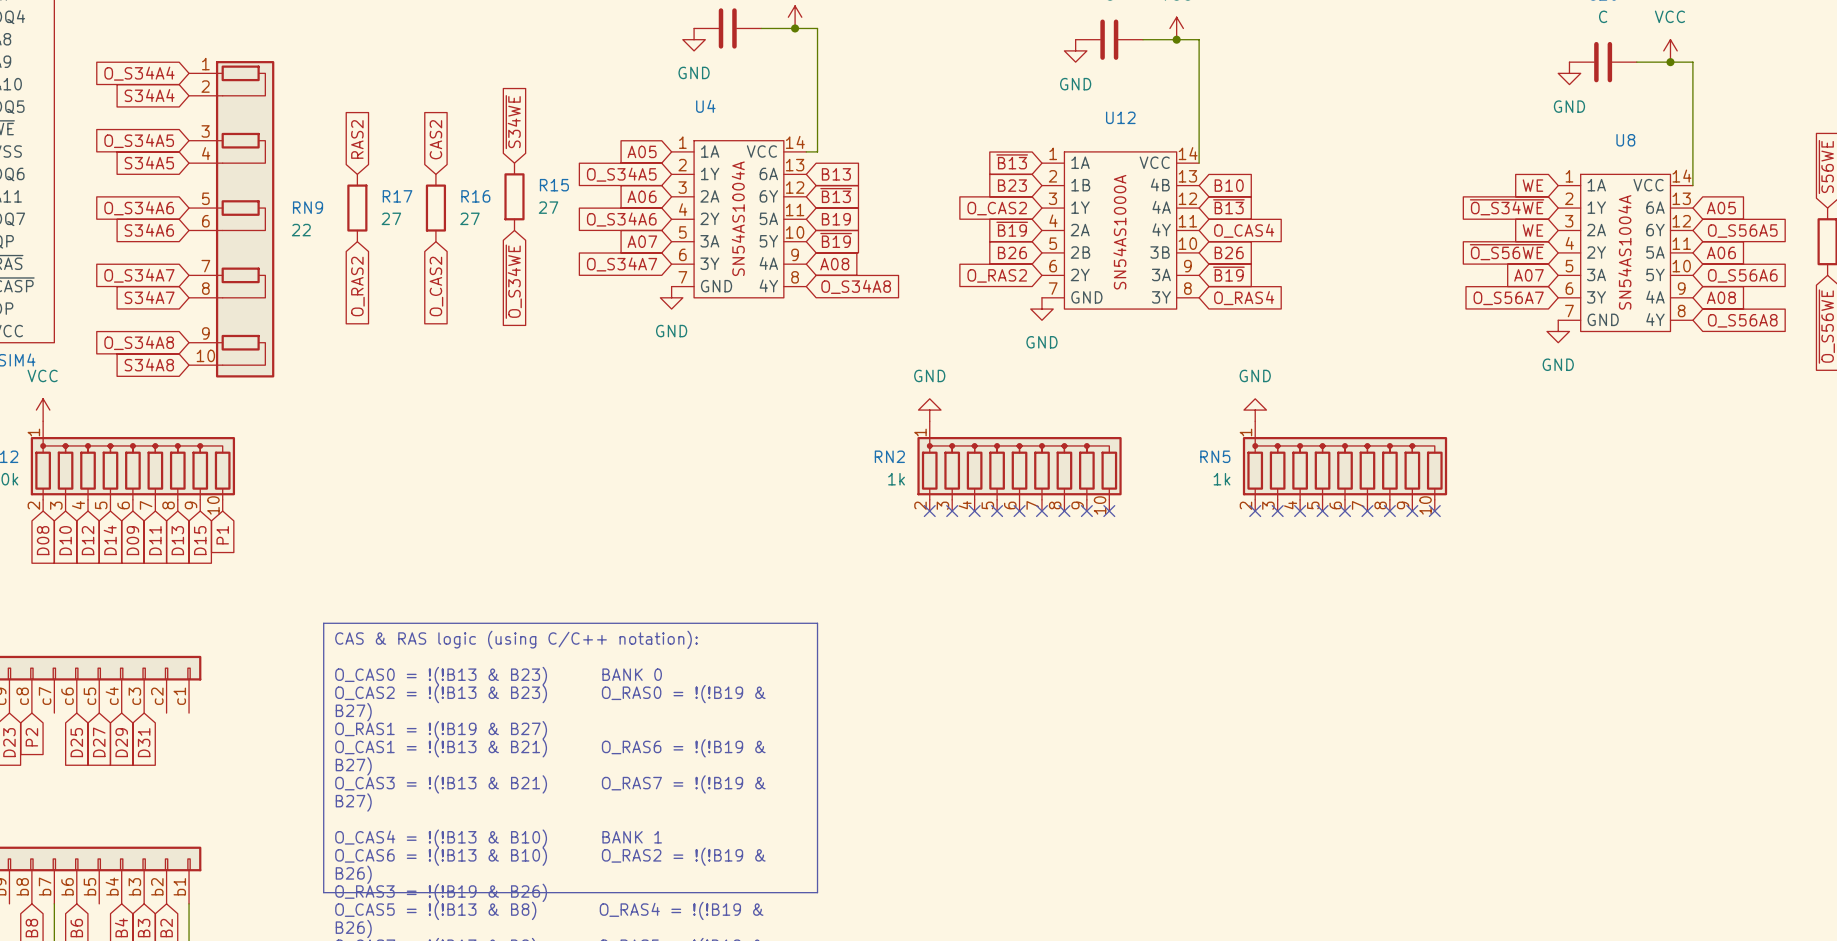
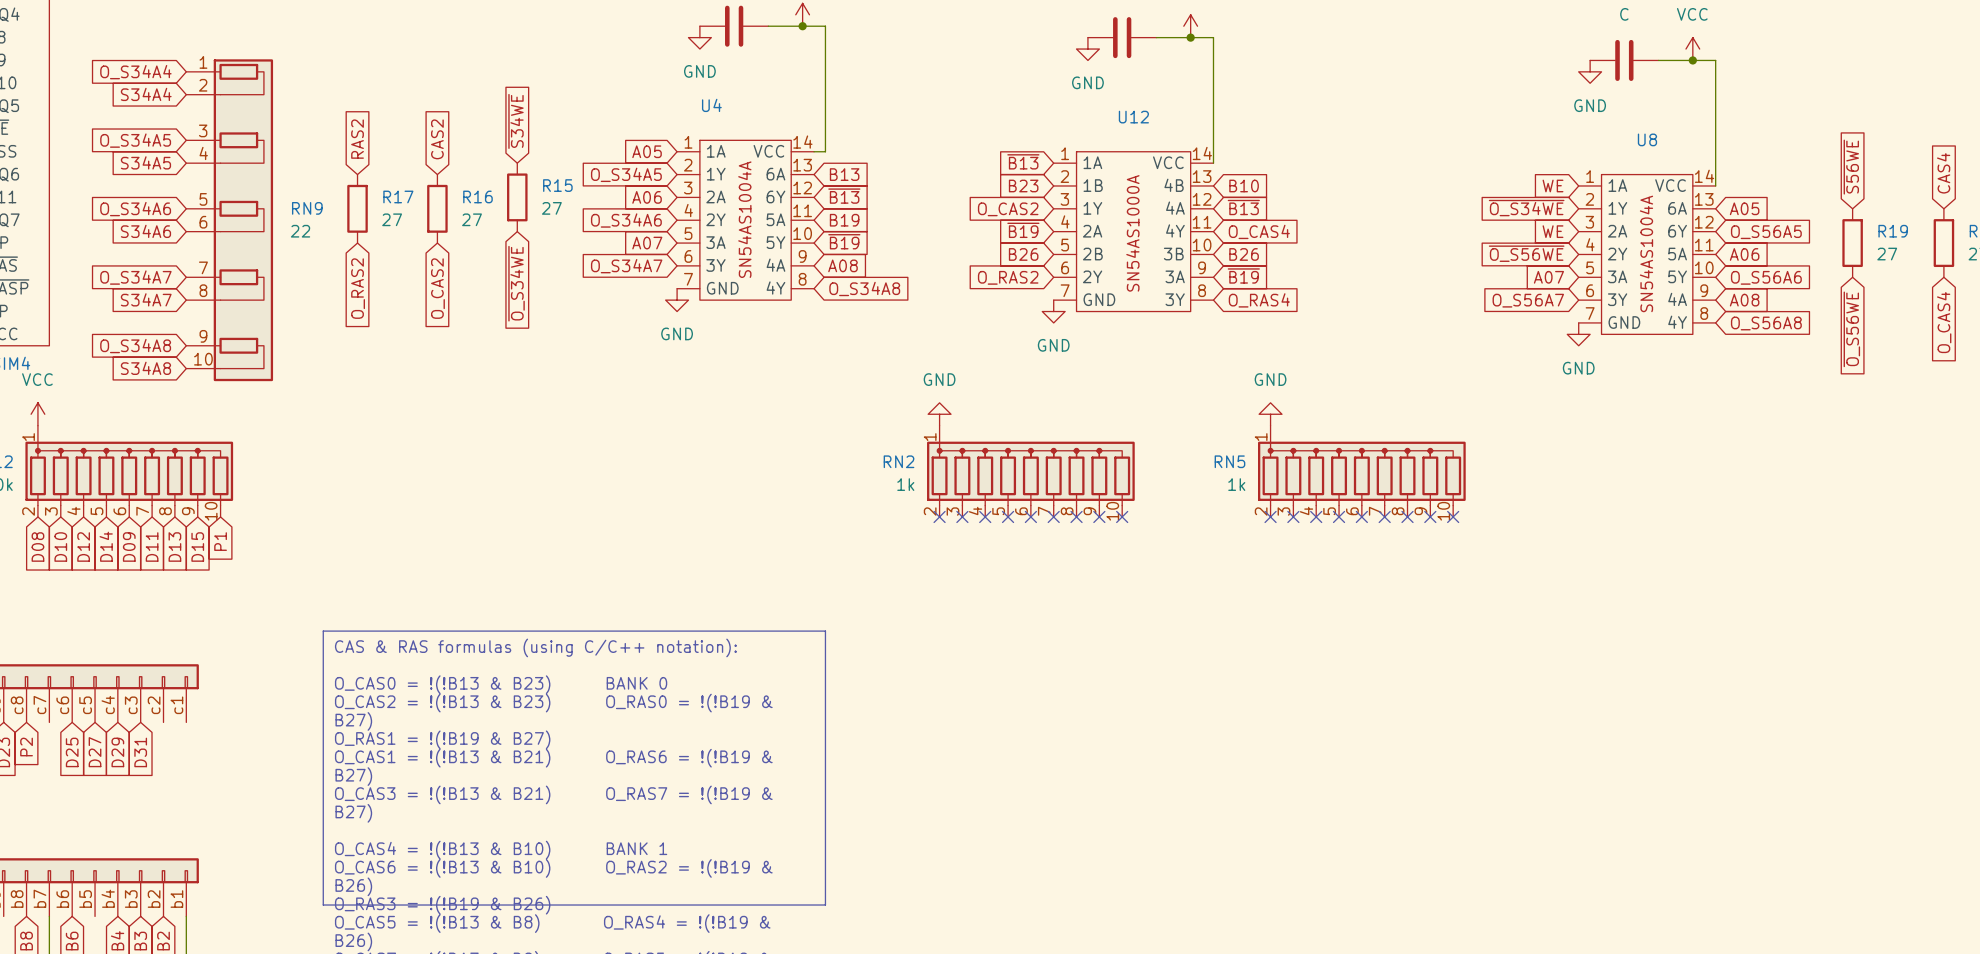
text: CAS & RAS logic (using C/C++ notation): (516, 639) -> CAS & RAS formulas (using C/C++ notation): (535, 647)

